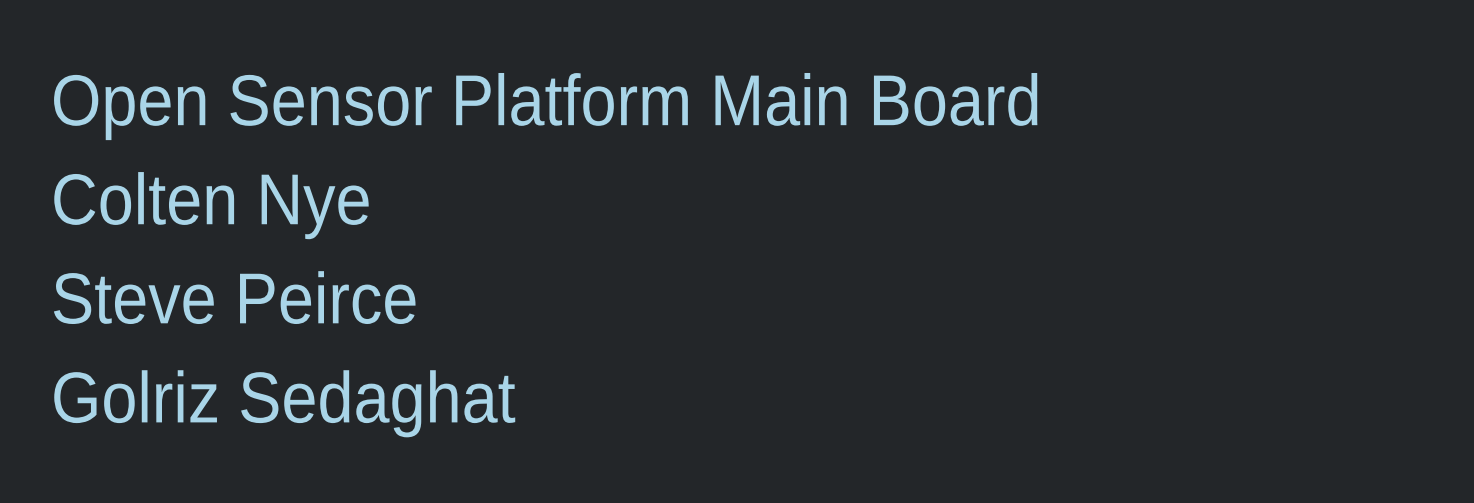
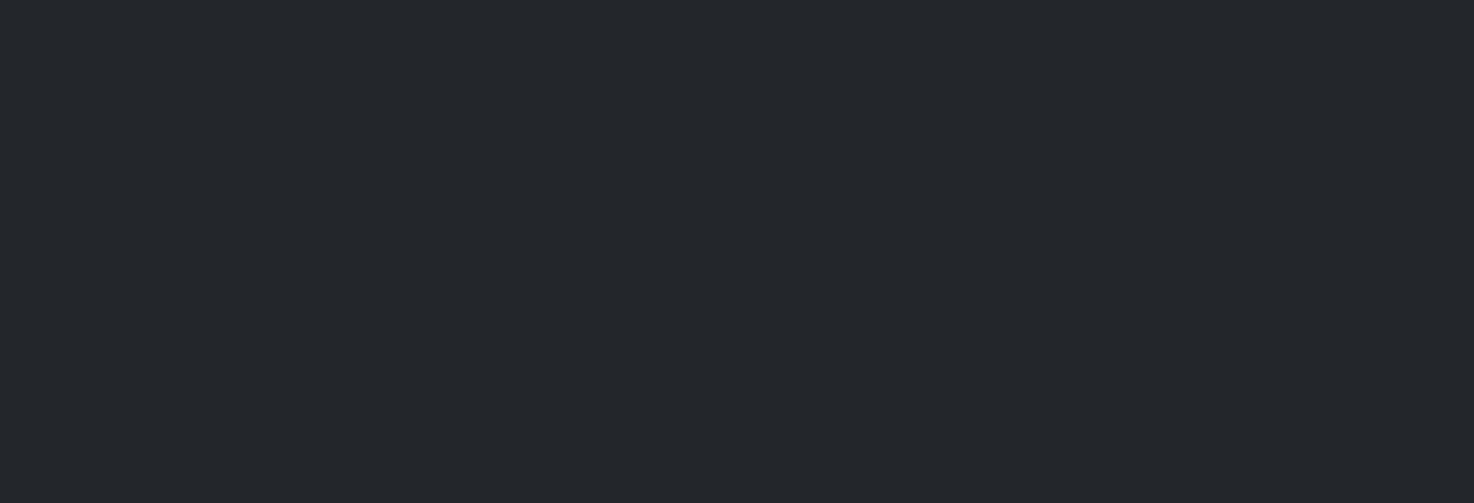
text: Open Sensor Platform Main Board (545, 106) -> none
text: Colten Nye (211, 205) -> none
text: Steve Peirce (234, 297) -> none
text: Golriz Sedaghat (284, 403) -> none

